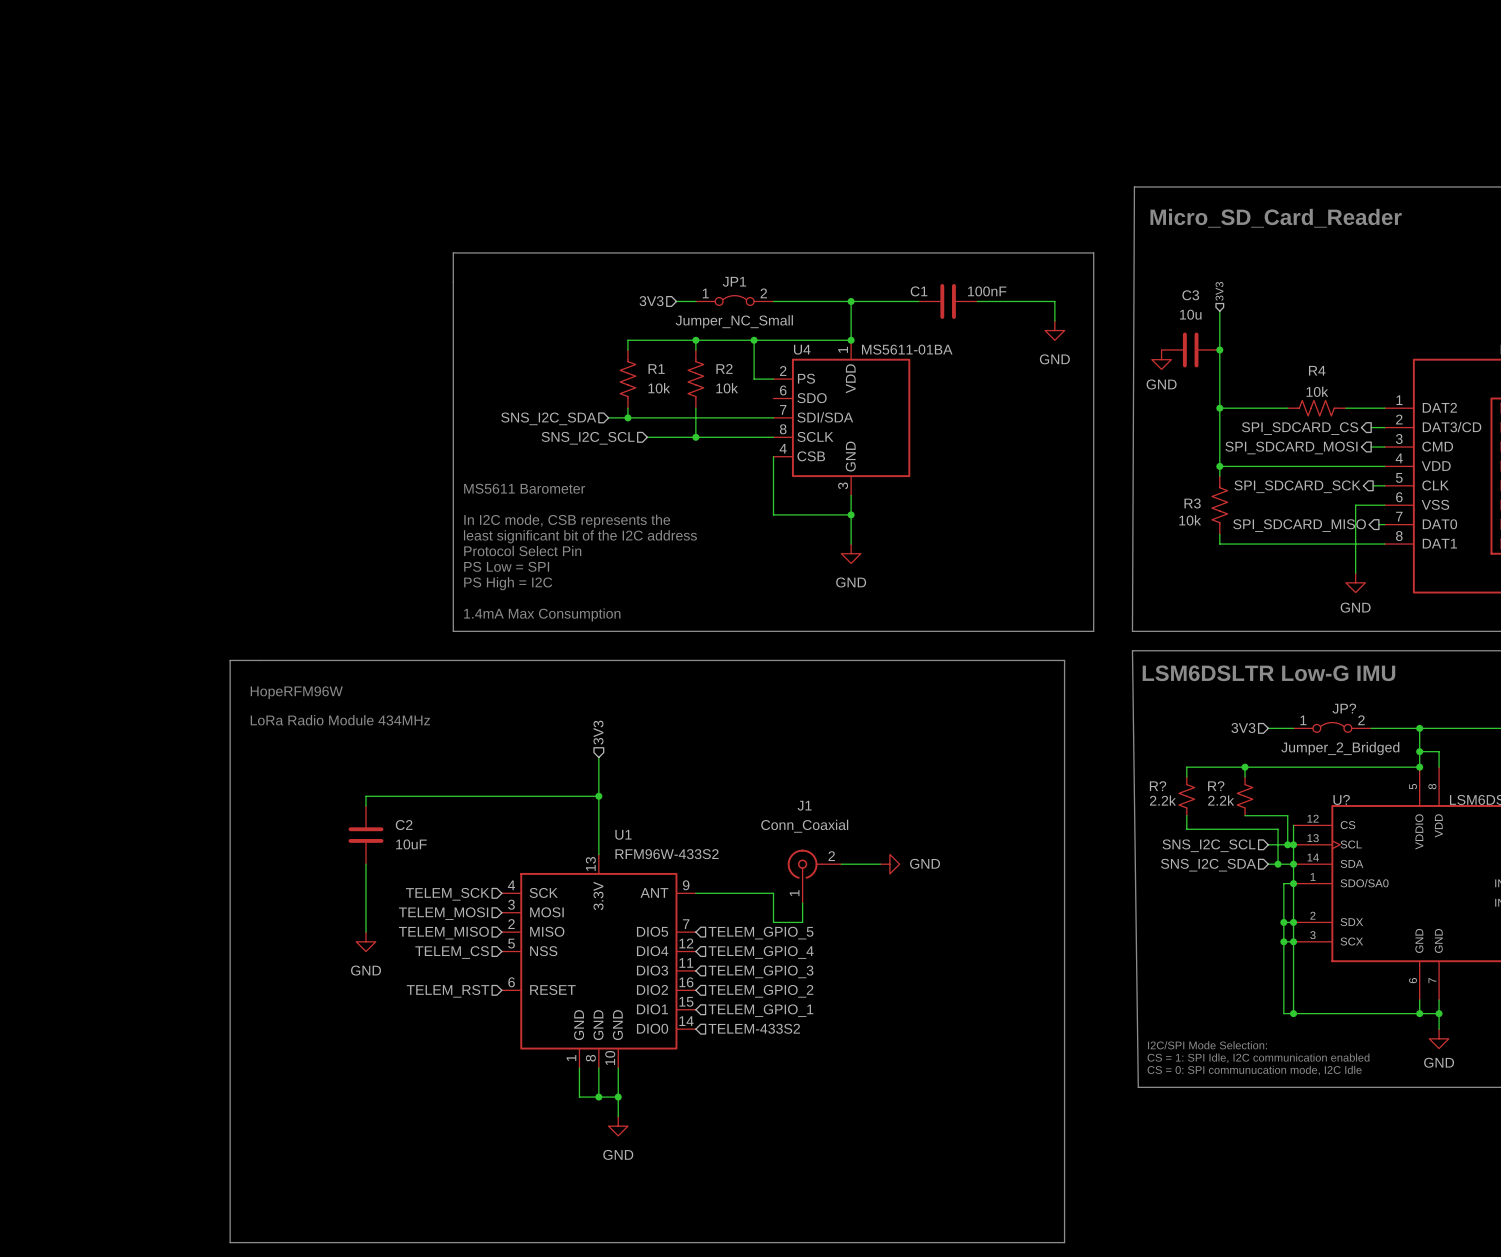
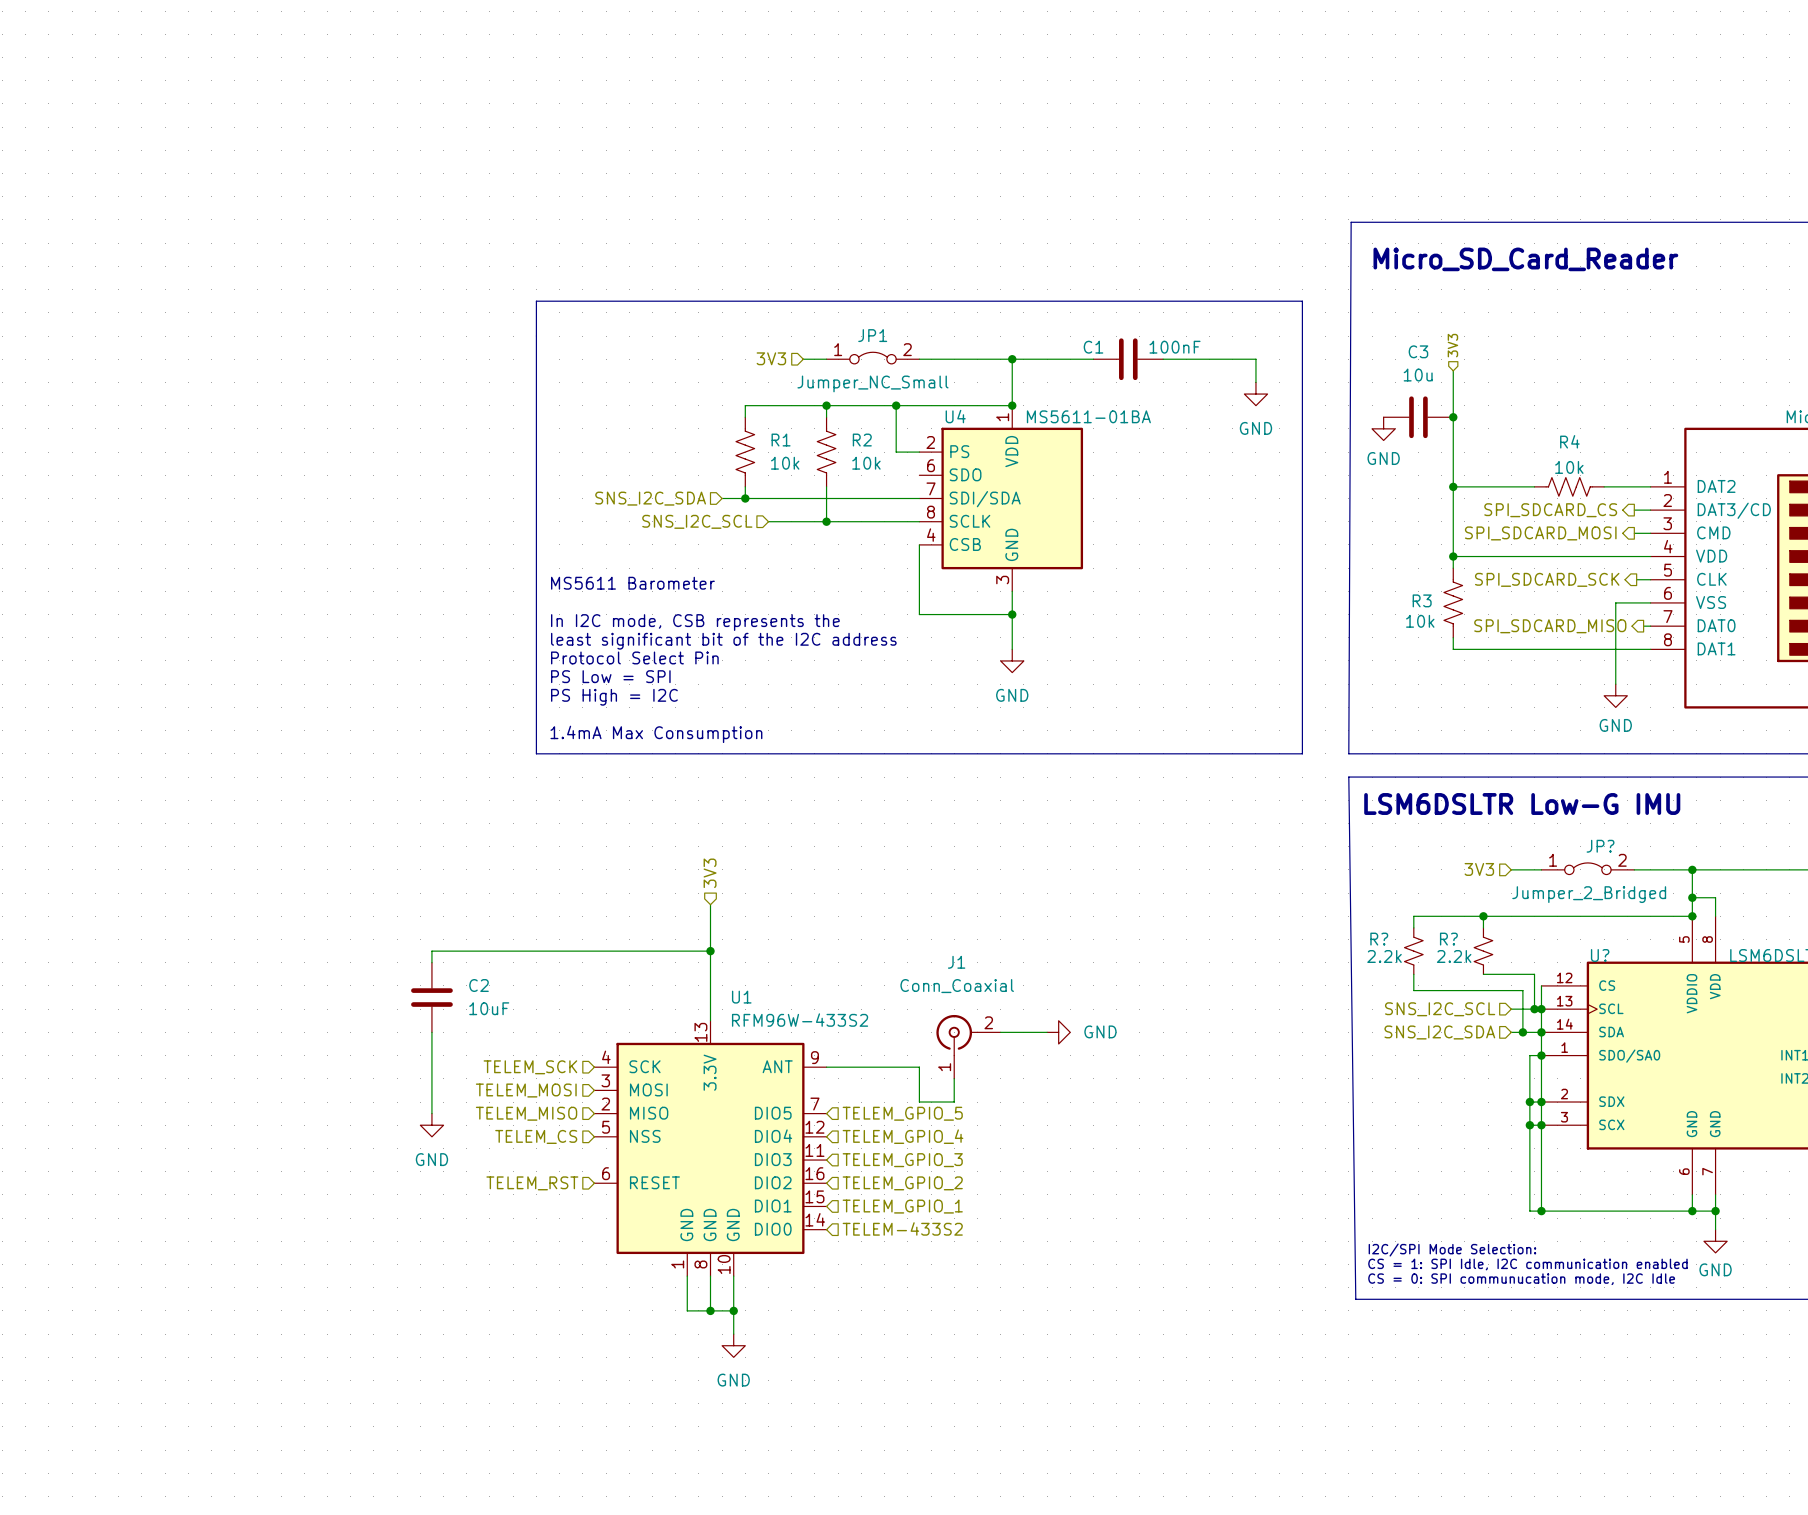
line: (230, 660) (1064, 660) (1064, 1242) (230, 1242) (230, 660) -> none
text: HopeRFM96W (296, 692) -> none
text: LoRa Radio Module 434MHz (340, 720) -> none

